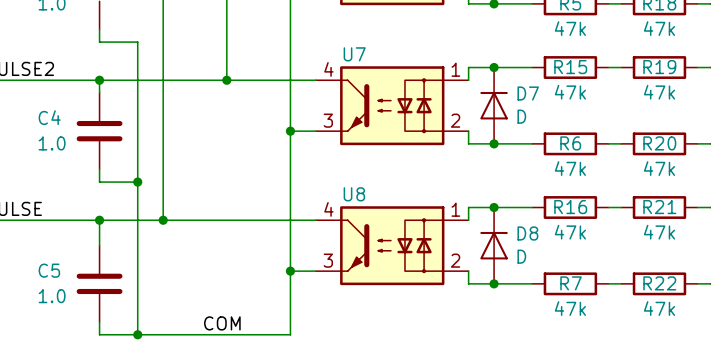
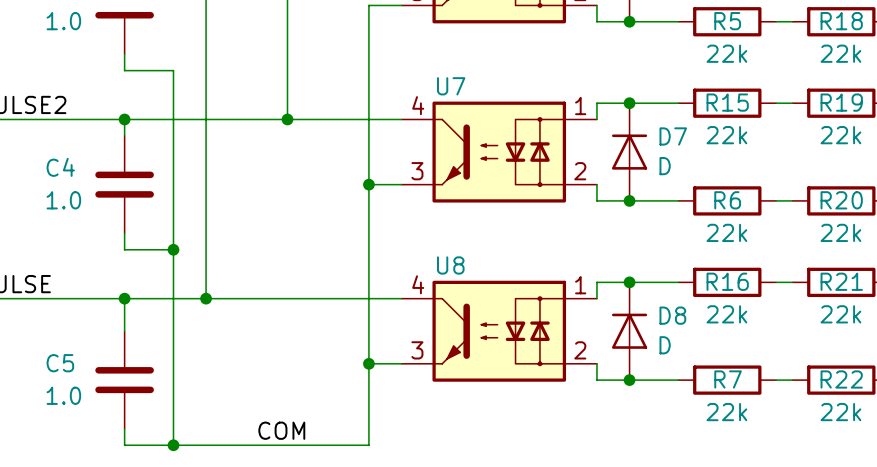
R5 value: 47k (570, 28) -> 22k (726, 53)
R18 value: 47k (659, 28) -> 22k (840, 53)
R15 value: 47k (570, 92) -> 22k (726, 135)
R19 value: 47k (659, 92) -> 22k (840, 135)
R6 value: 47k (570, 168) -> 22k (726, 232)
R20 value: 47k (659, 168) -> 22k (840, 232)
R16 value: 47k (570, 232) -> 22k (726, 314)
R21 value: 47k (659, 232) -> 22k (840, 314)
R7 value: 47k (570, 308) -> 22k (726, 412)
R22 value: 47k (659, 308) -> 22k (840, 412)

